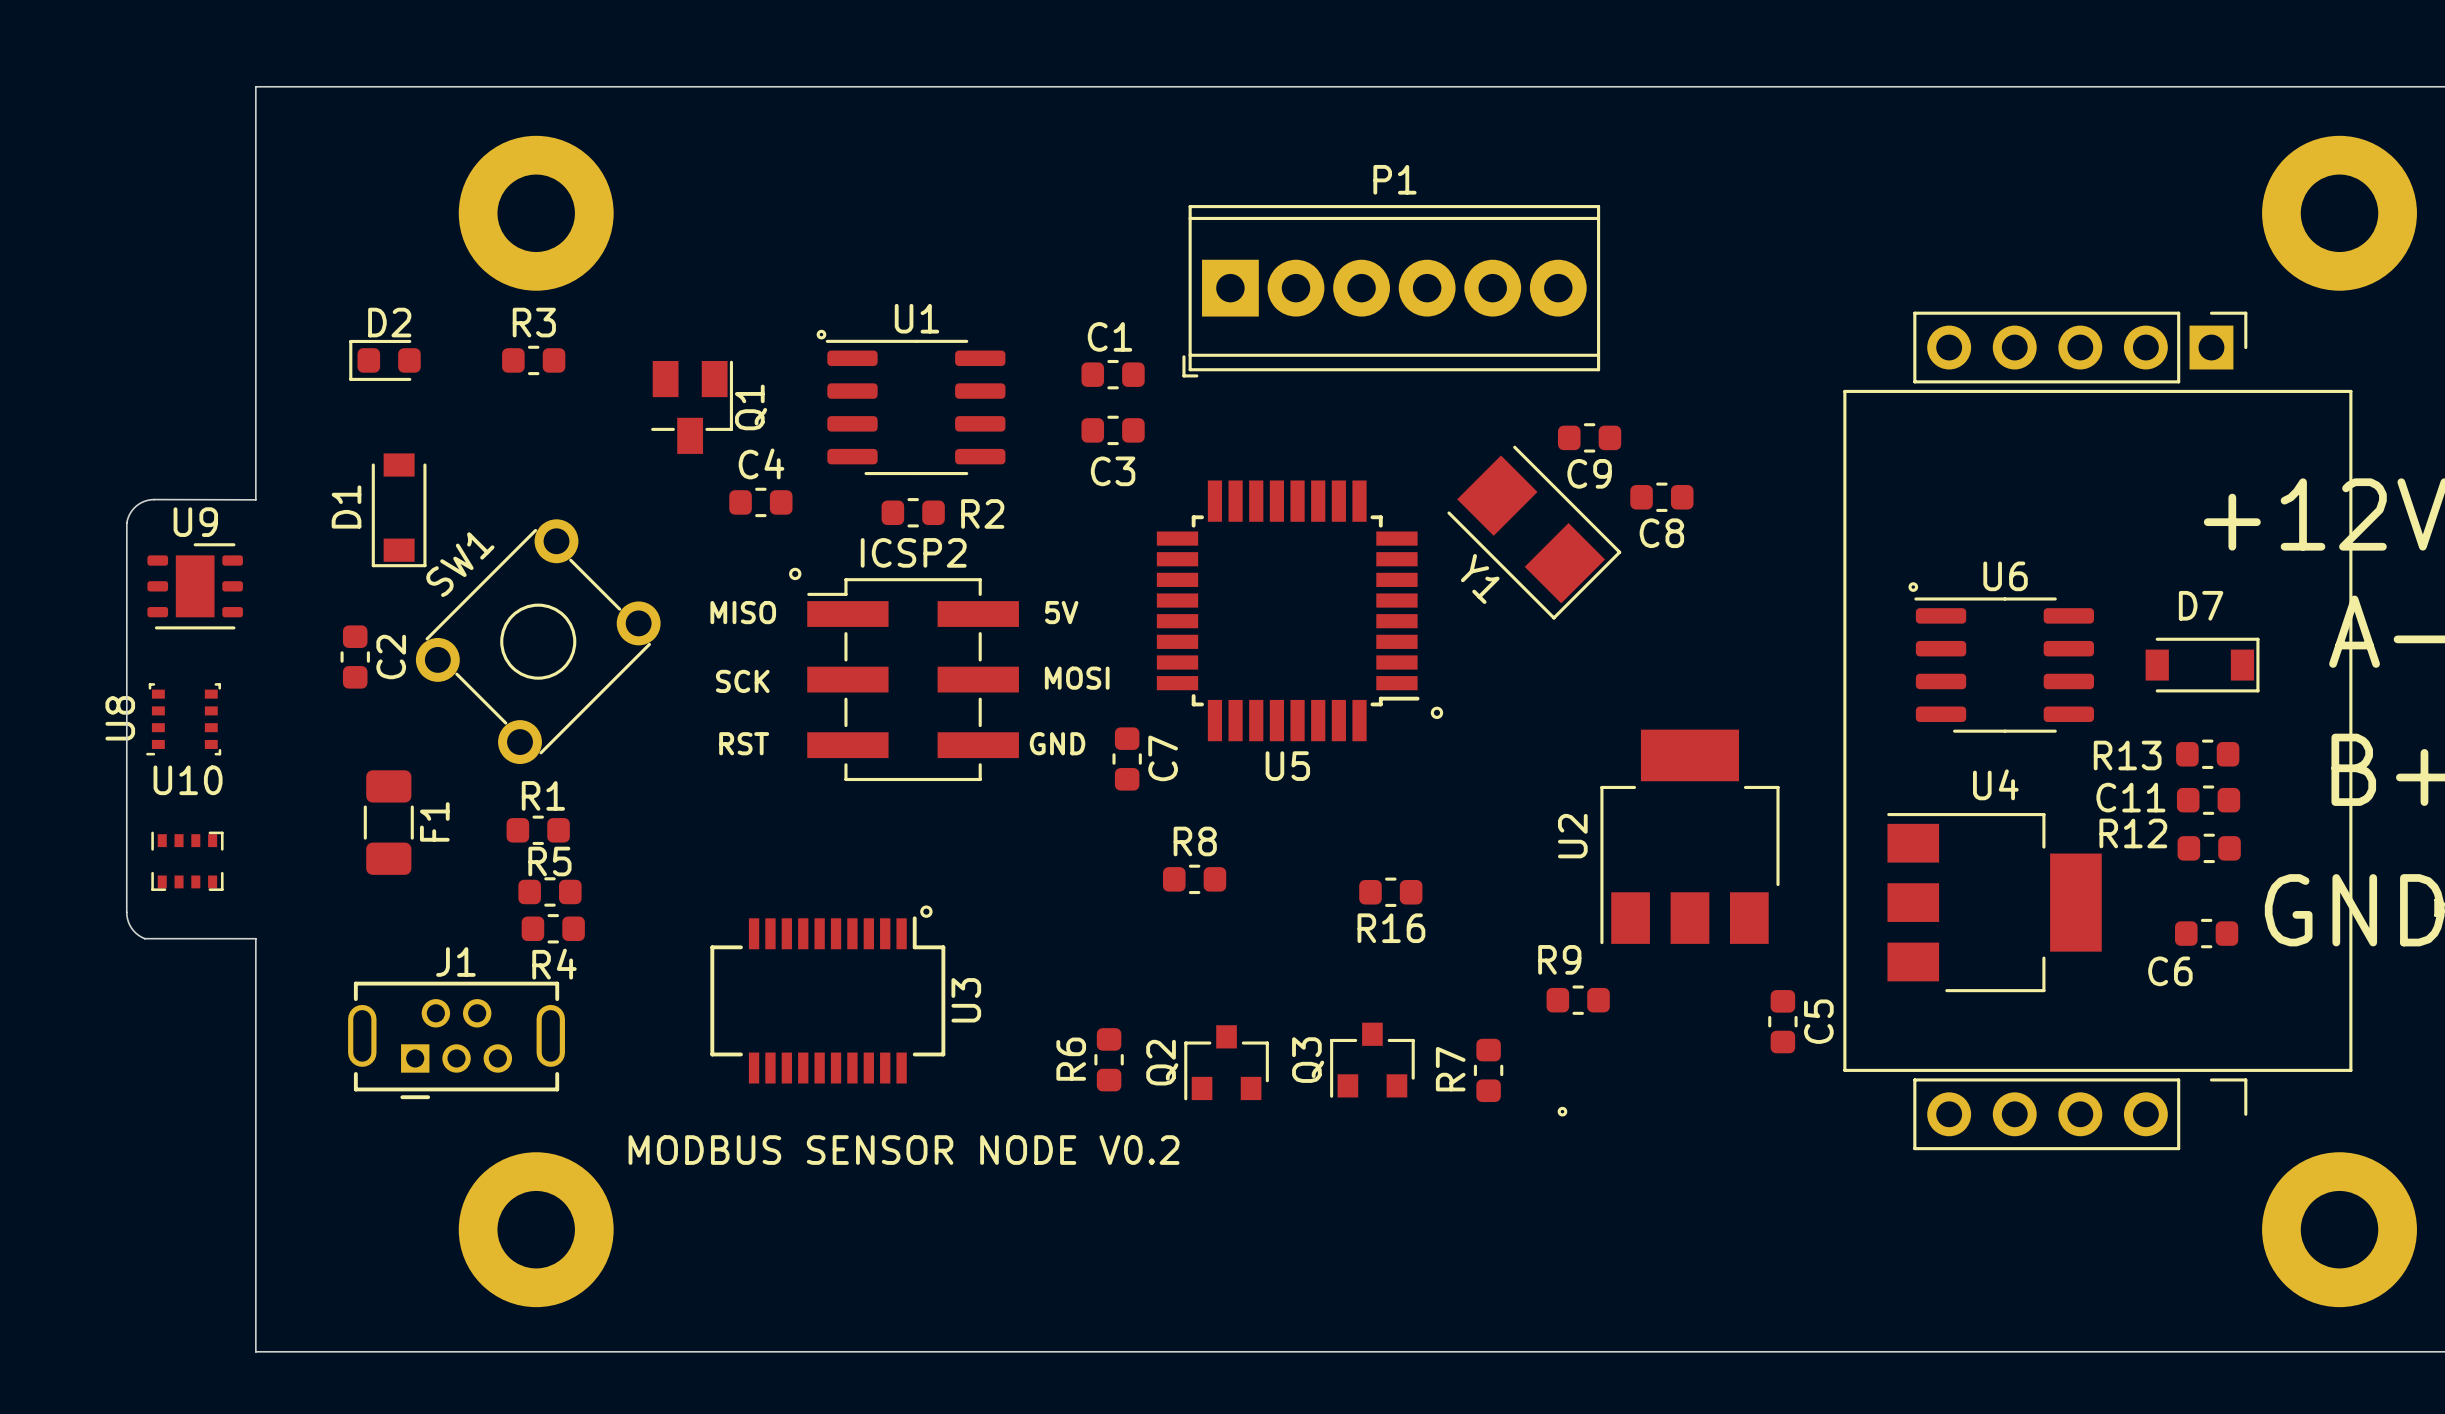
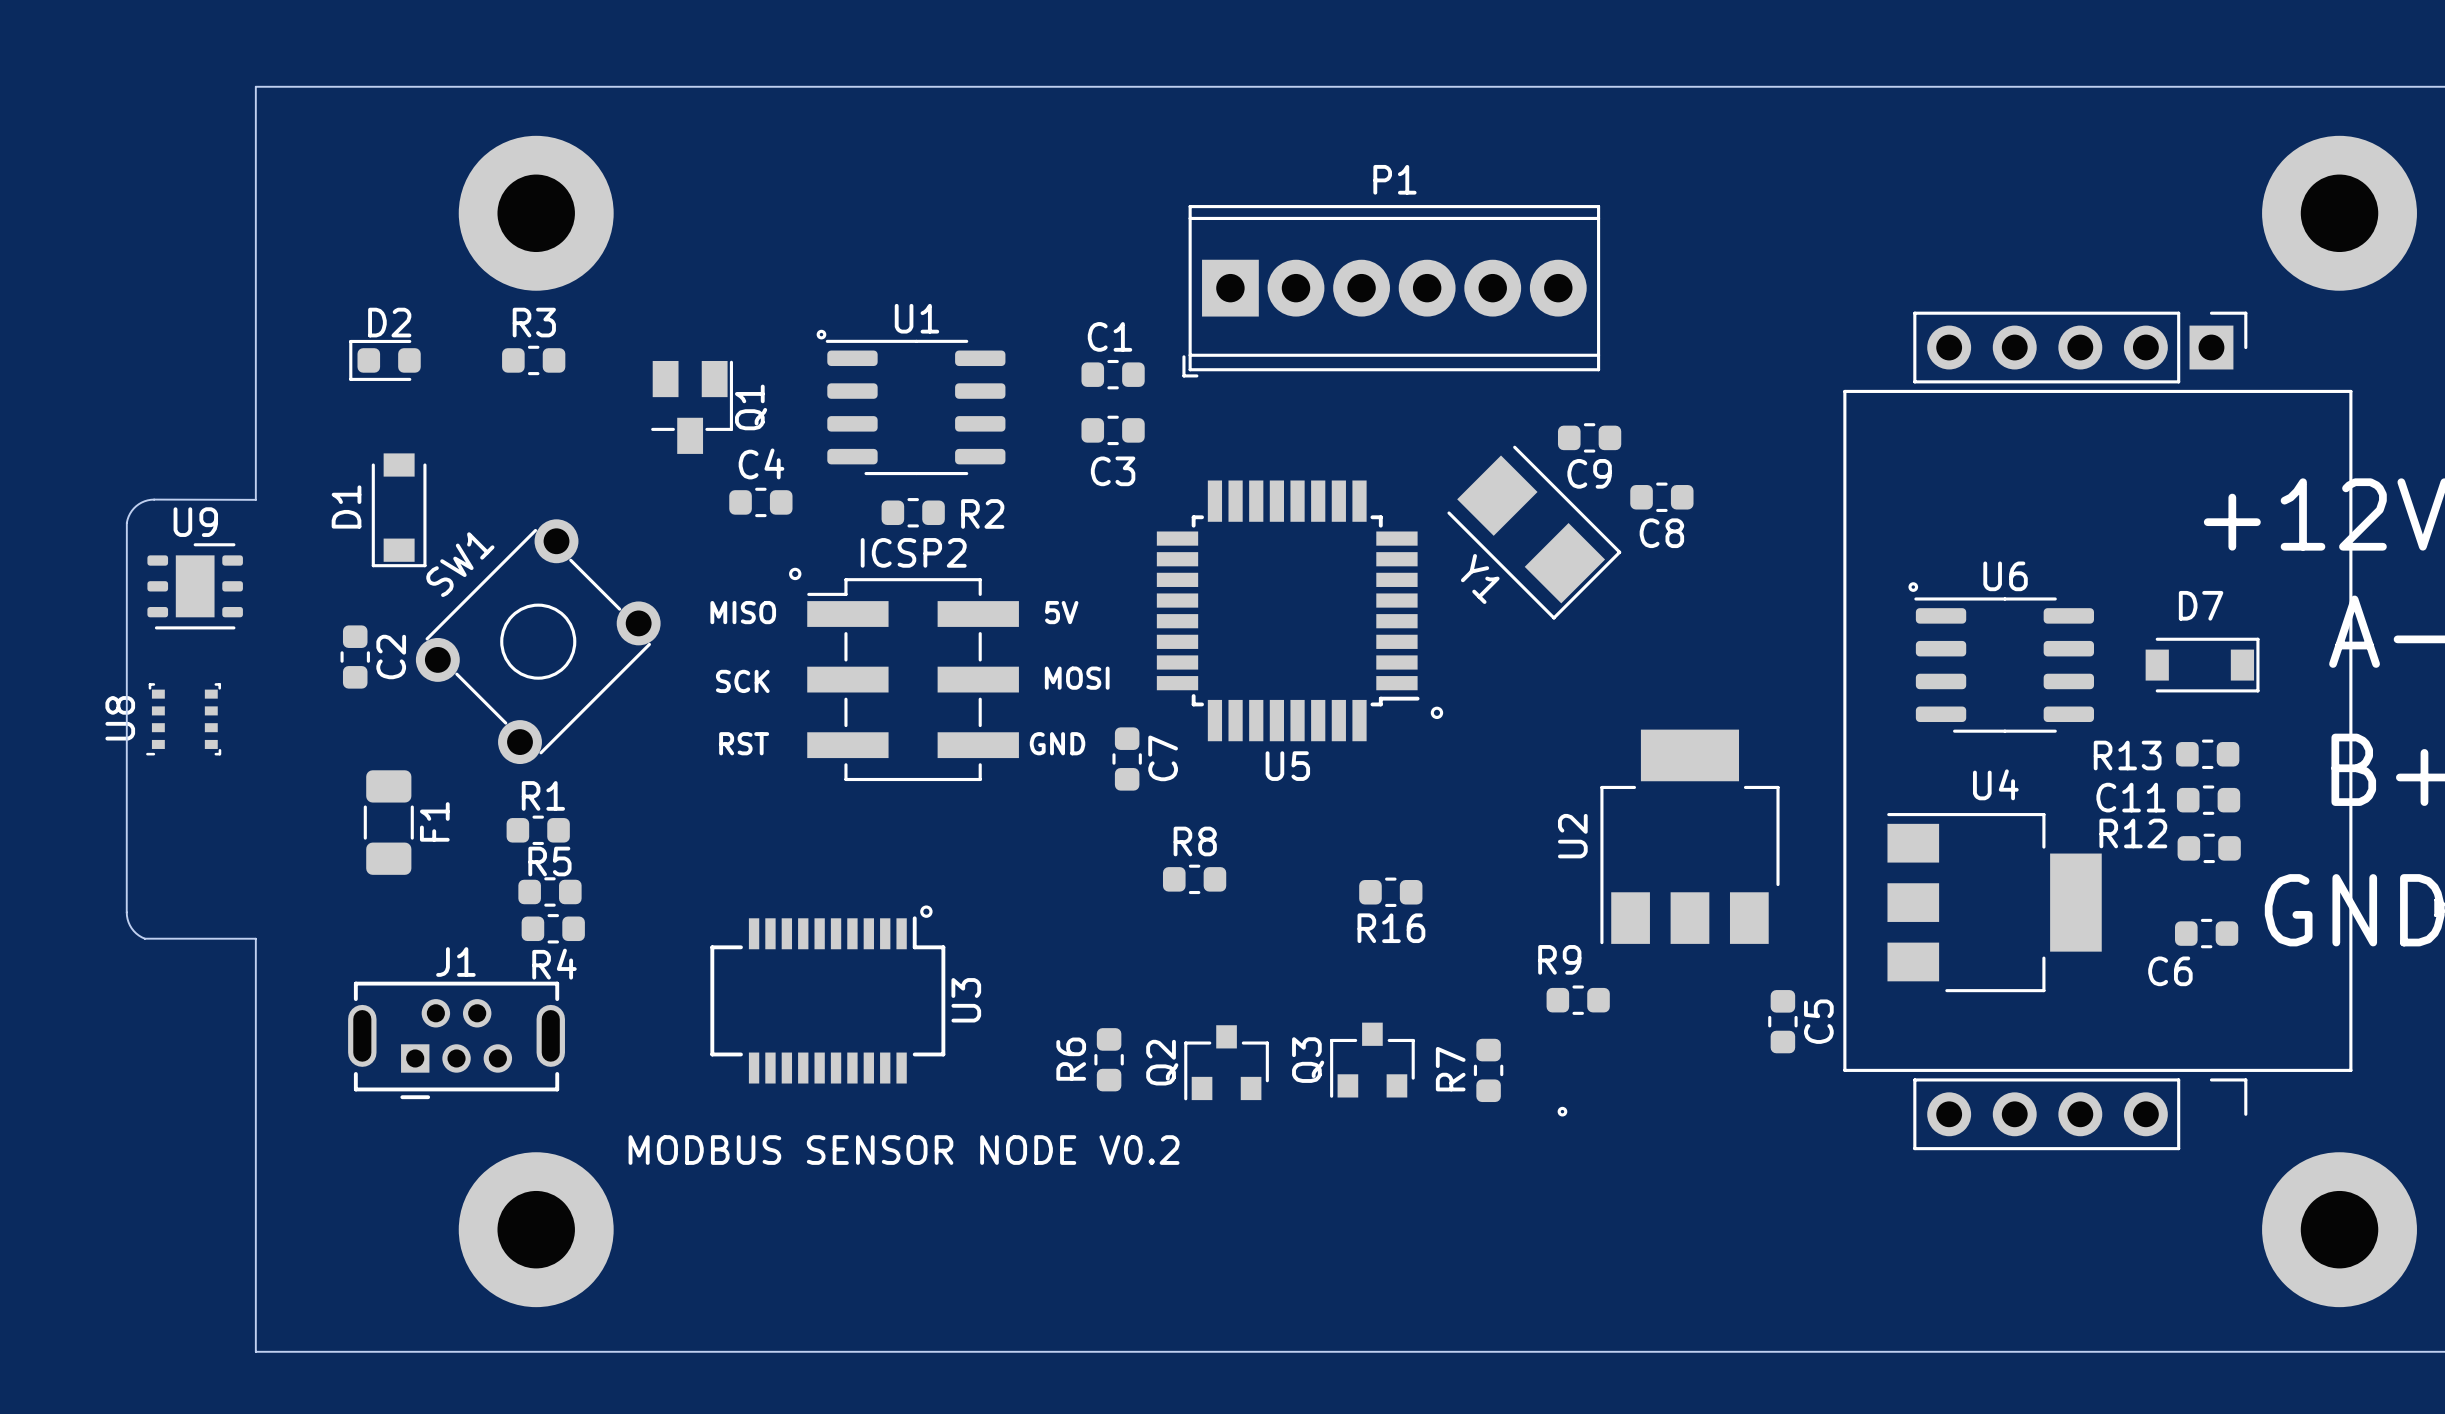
U10: (187, 861) -> none

